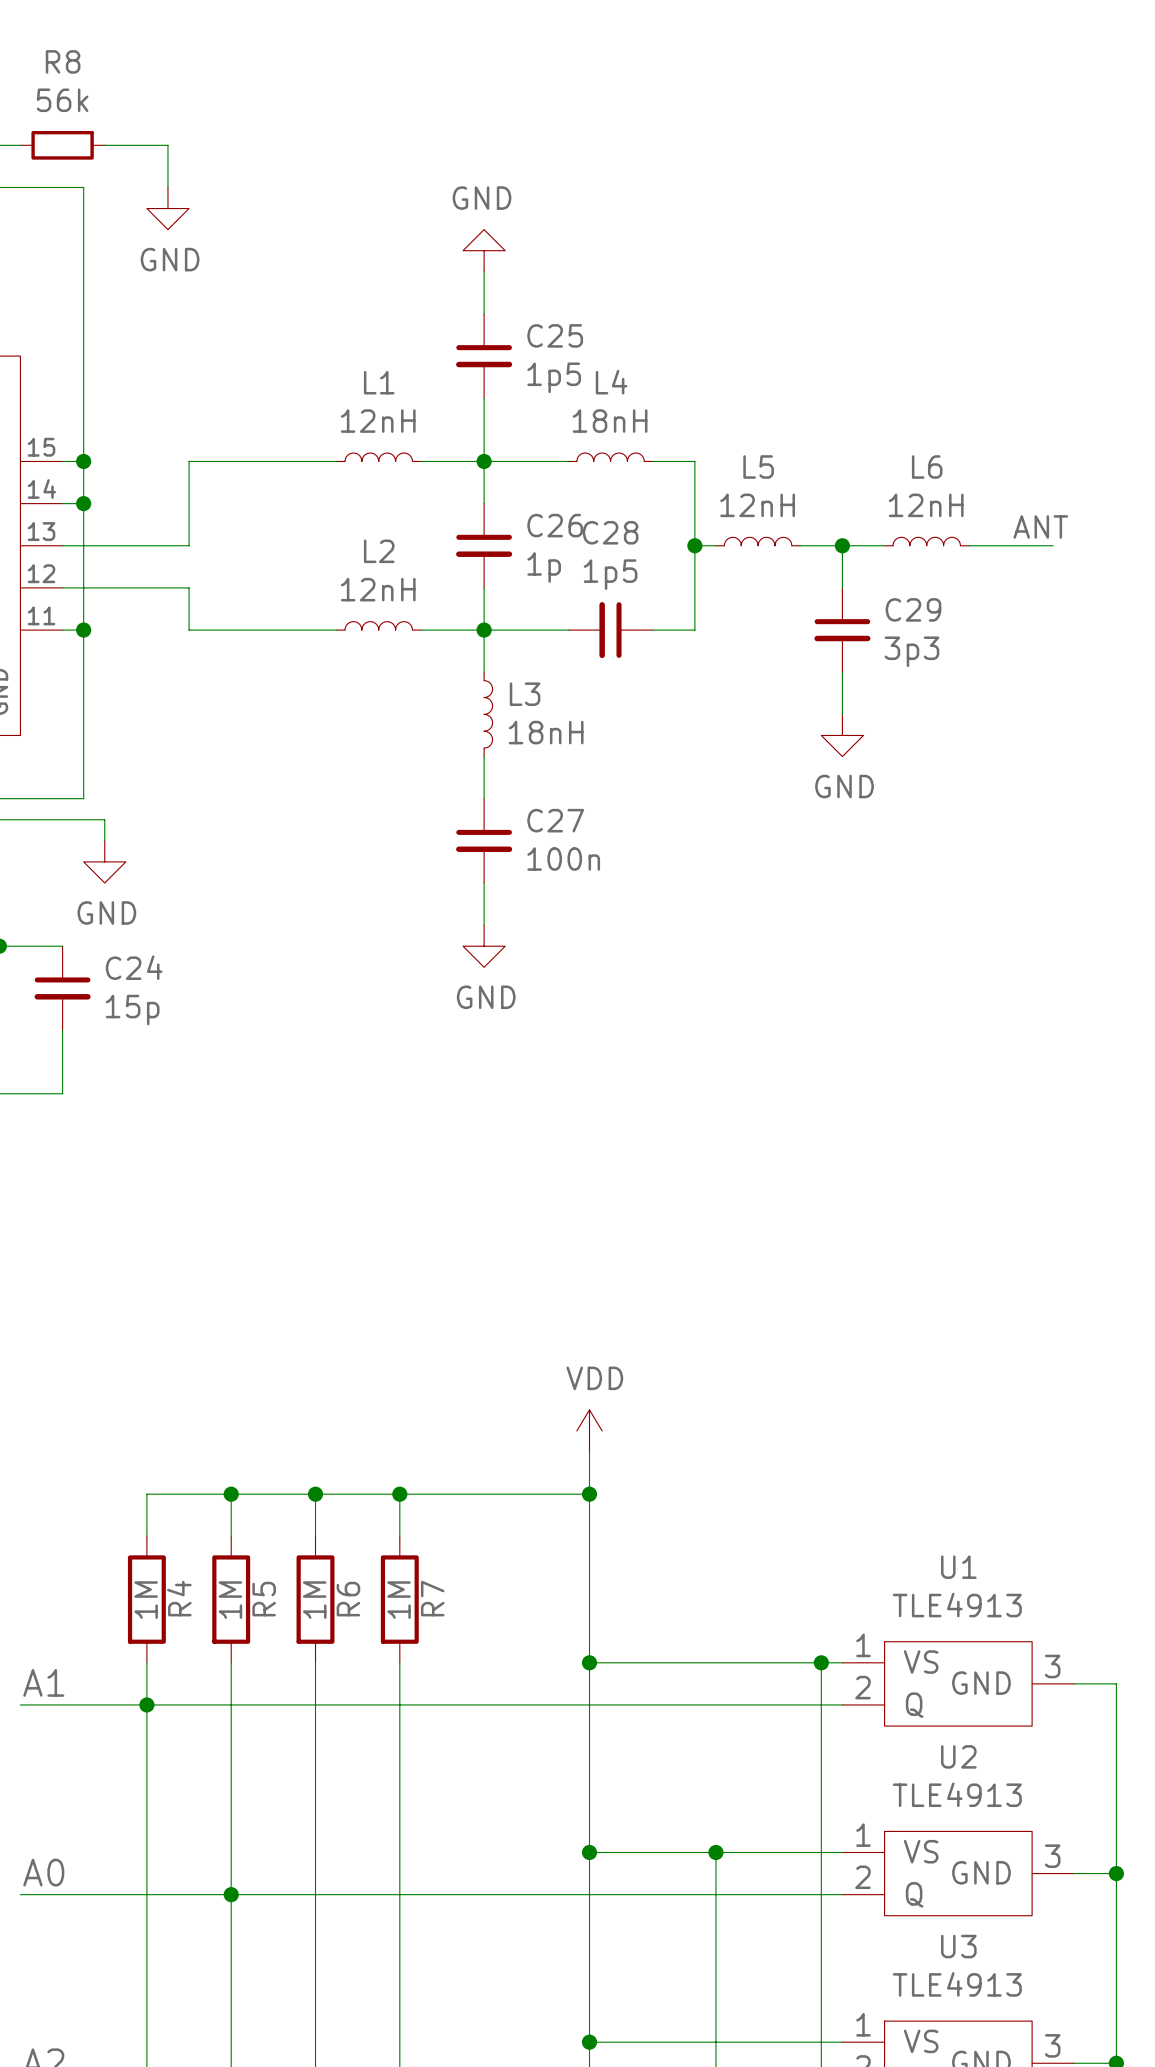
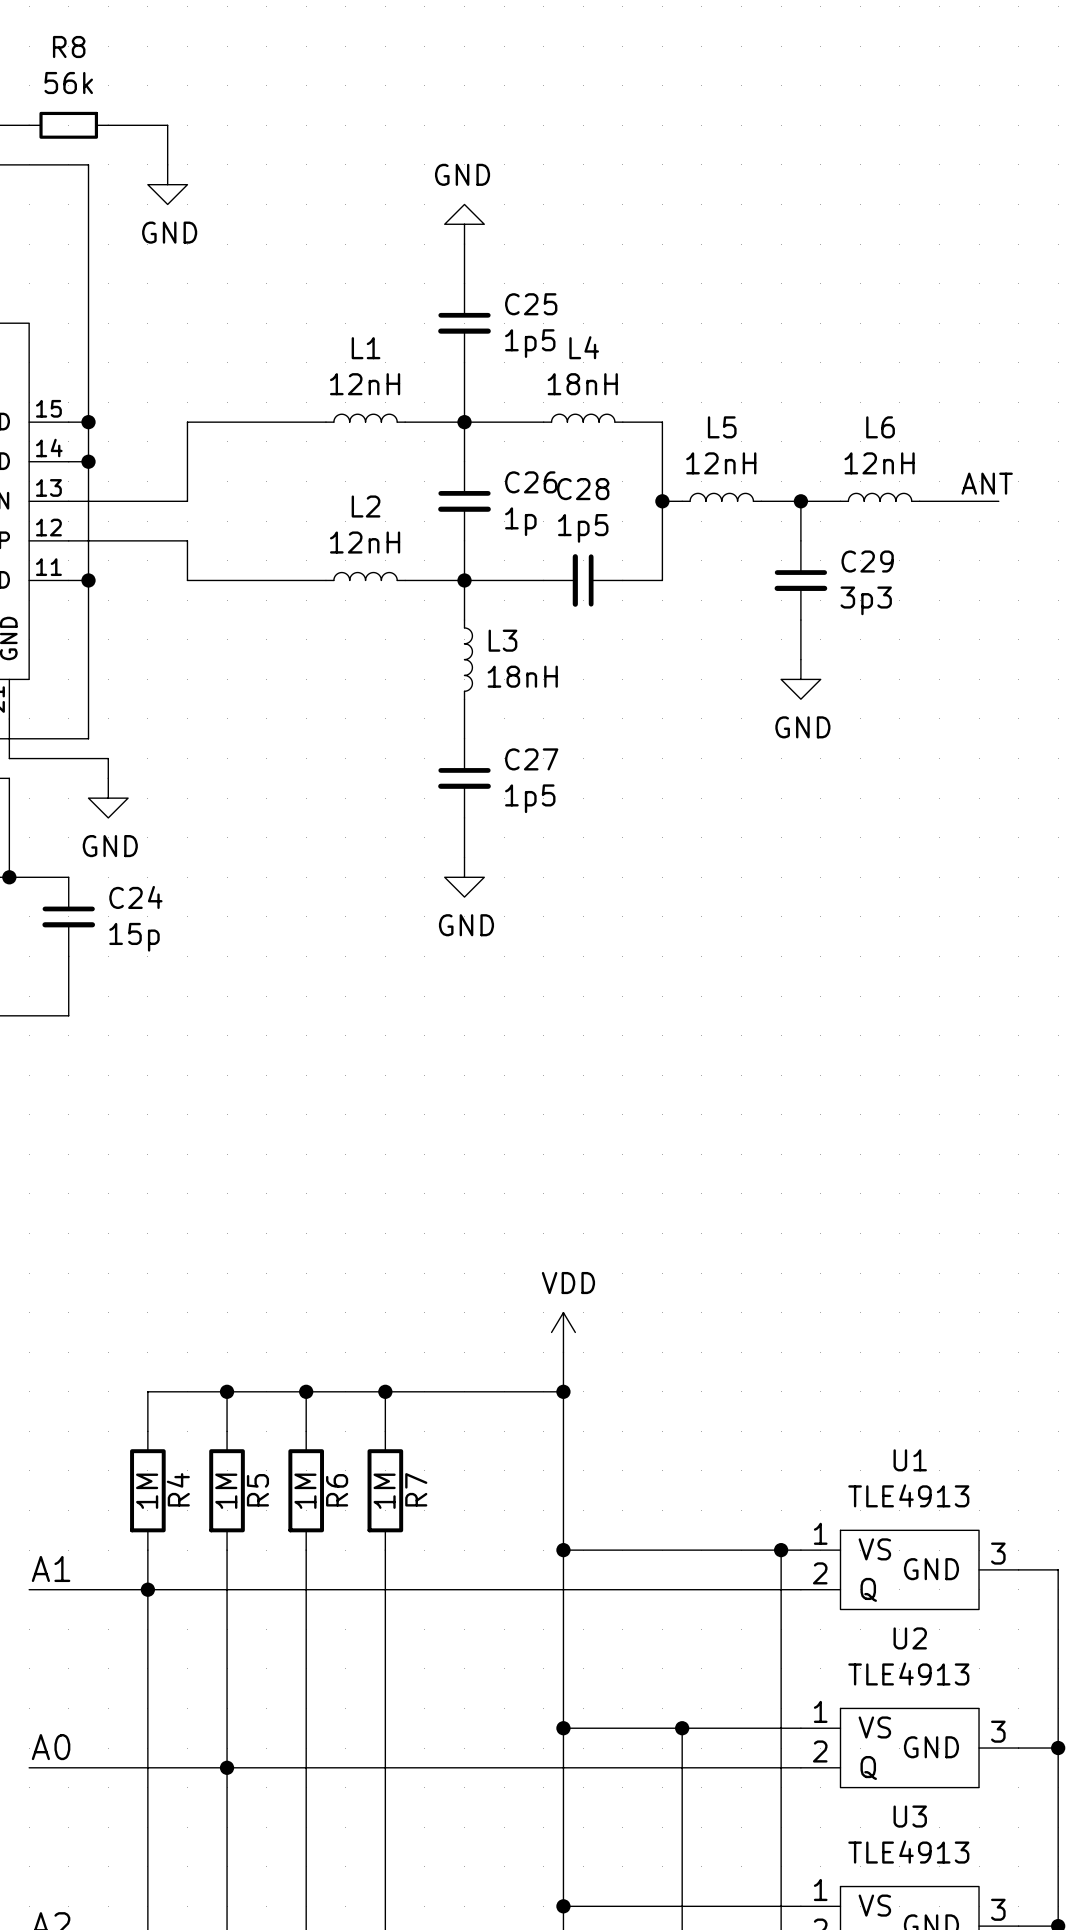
C27 value: 100n (563, 859) -> 1p5 (530, 798)

